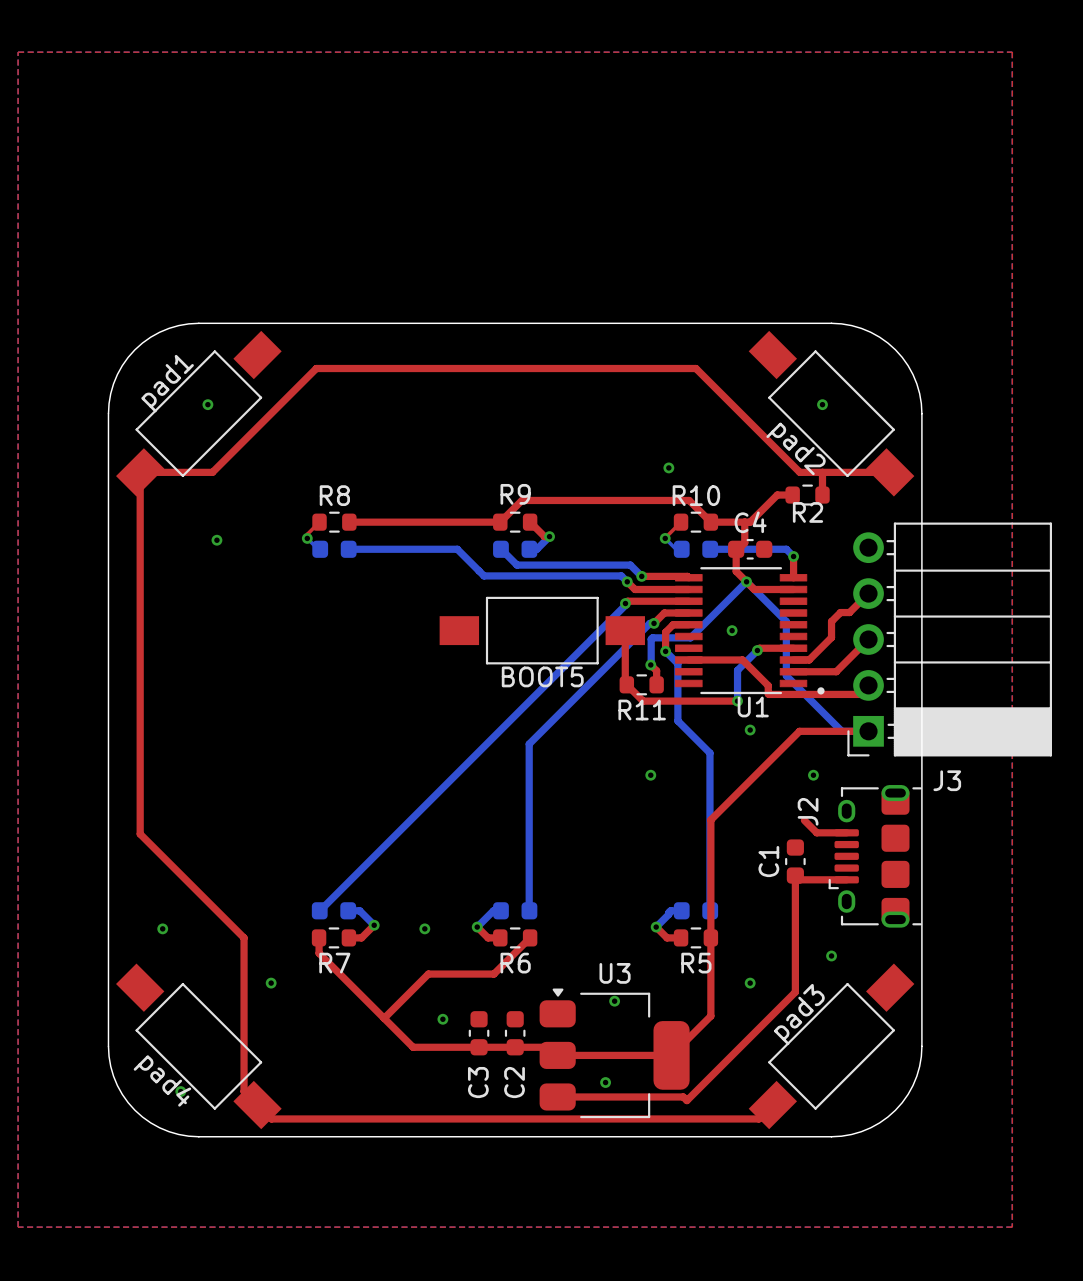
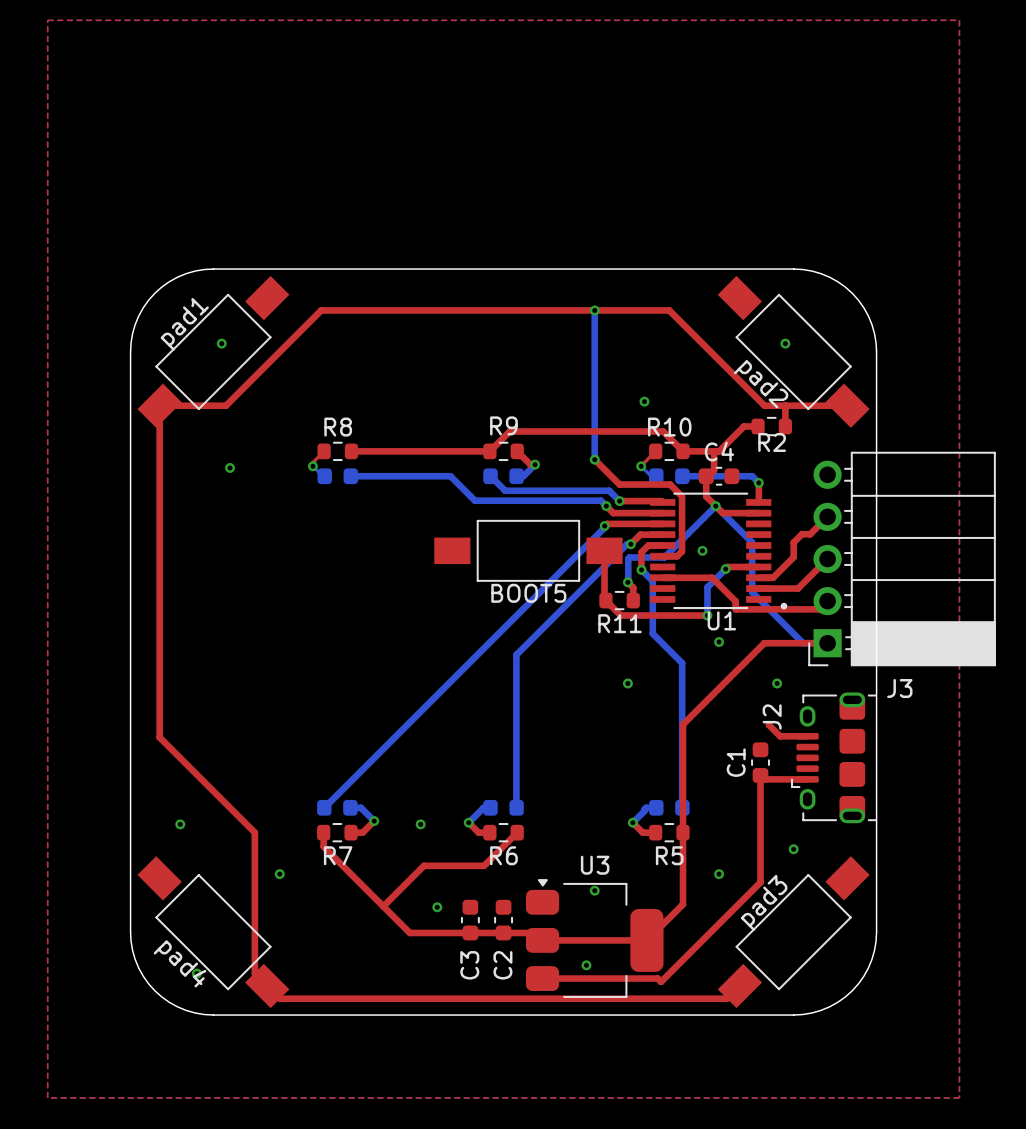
bottom track: none -> (594, 310) (594, 459)
via: none -> (594, 310)
top track: none -> (594, 459) (619, 484) (670, 484) (682, 496) (682, 551) (677, 556) (662, 556)
via: none -> (594, 459)

